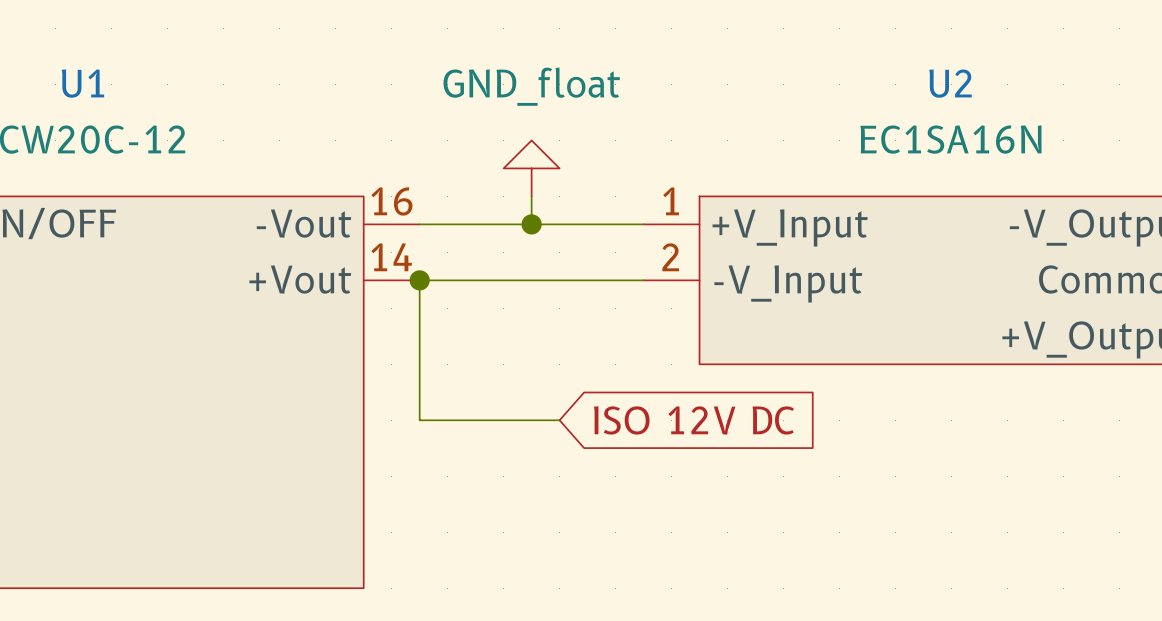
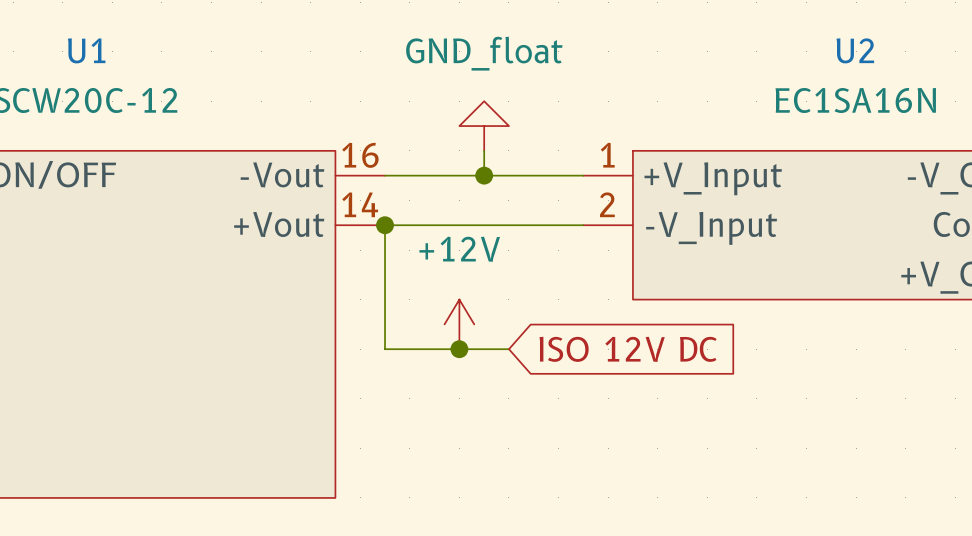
power symbol: none -> +12V (459, 324)
junction: none -> (459, 349)

